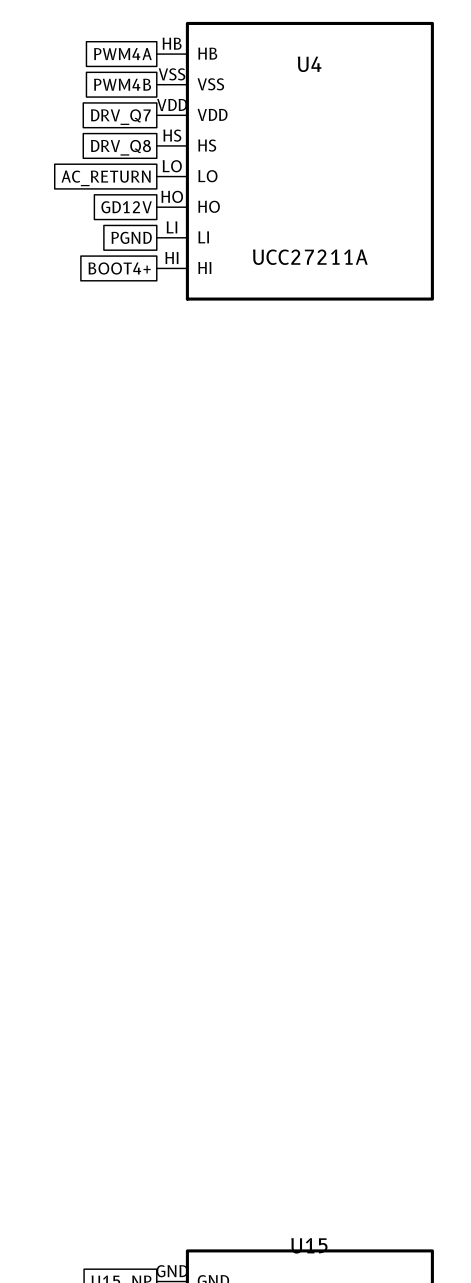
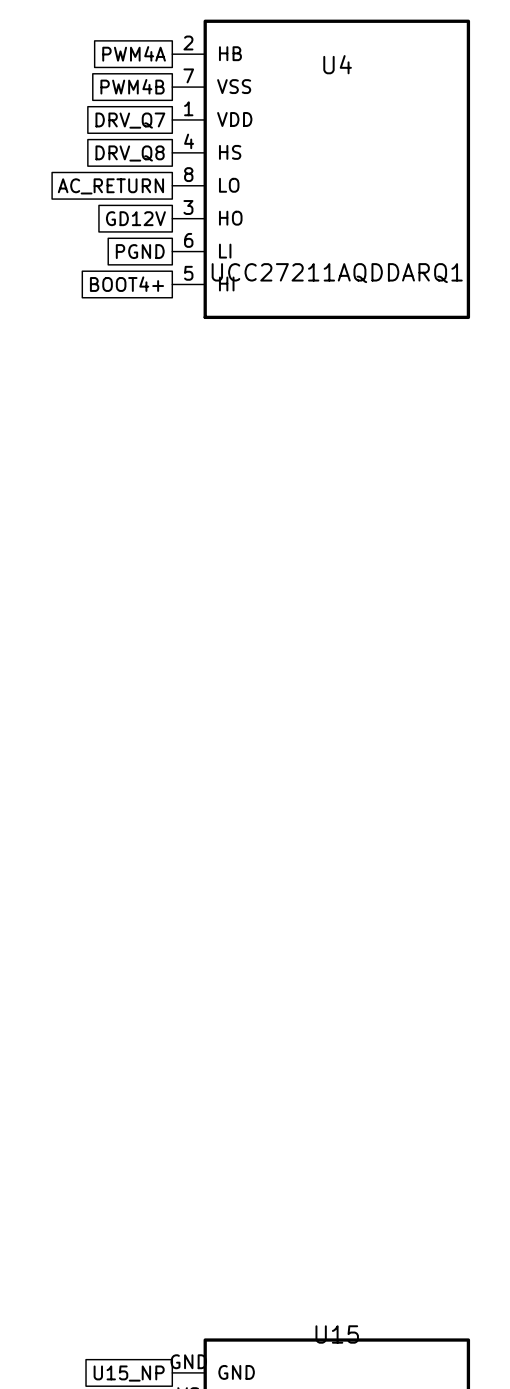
U4 pin number: HB (172, 43) -> 2 (188, 42)
U4 pin number: VSS (172, 74) -> 7 (188, 75)
U4 pin number: VDD (172, 104) -> 1 (188, 108)
U4 pin number: HS (172, 135) -> 4 (189, 141)
U4 pin number: LO (172, 166) -> 8 (188, 174)
U4 pin number: HO (172, 196) -> 3 (188, 207)
U4 pin number: LI (171, 227) -> 6 (188, 240)
U4 value: UCC27211A (310, 257) -> UCC27211AQDDARQ1 (337, 273)
U4 pin number: HI (171, 258) -> 5 (188, 273)

